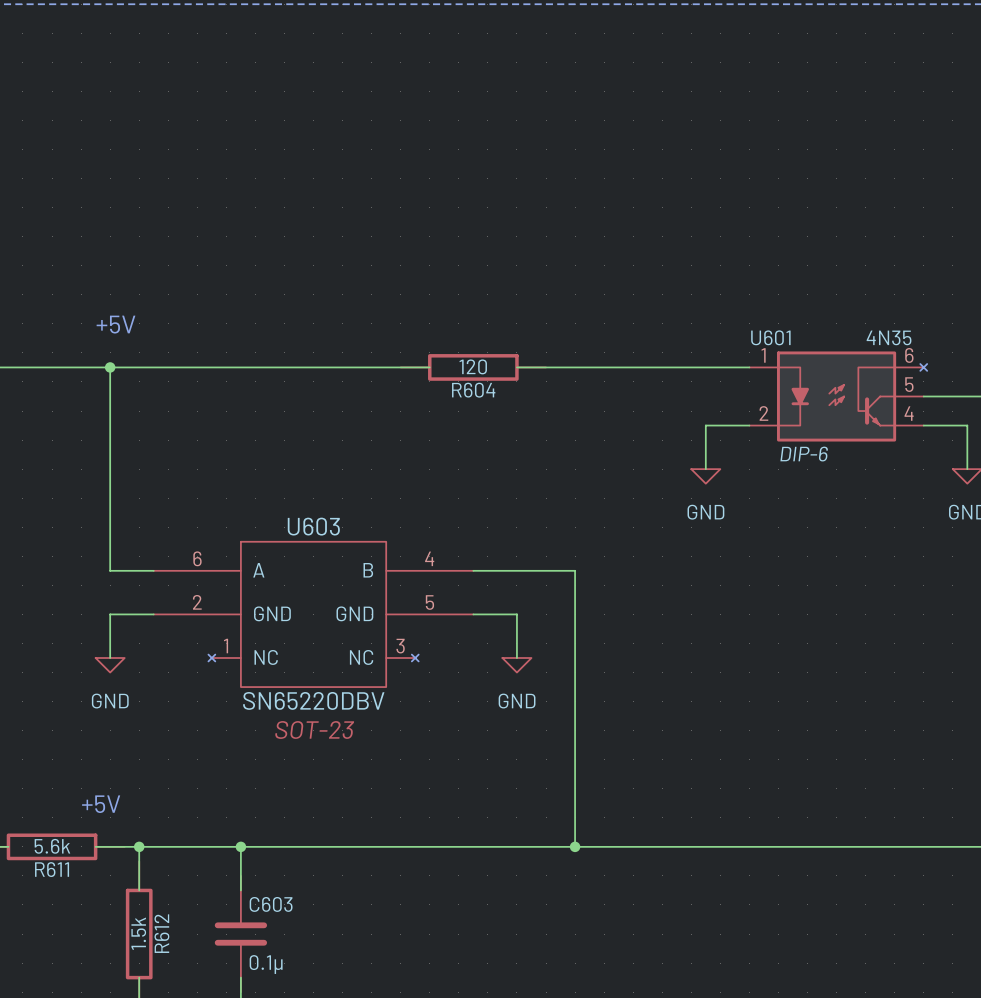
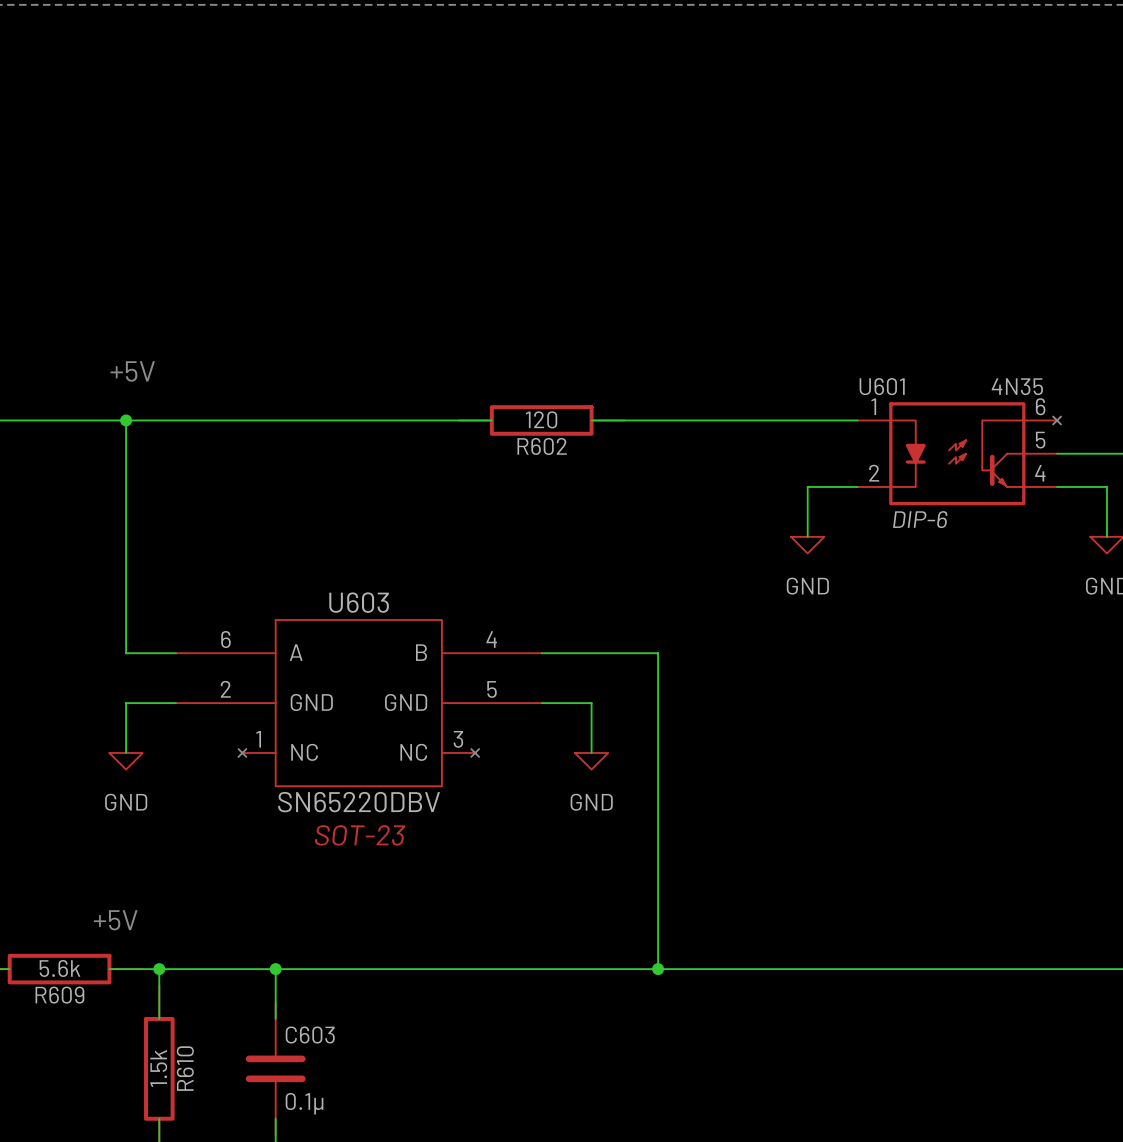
R604 name: R604 (473, 390) -> R602 (542, 446)
R611 name: R611 (52, 869) -> R609 (59, 995)
R612 name: R612 (161, 933) -> R610 (185, 1068)

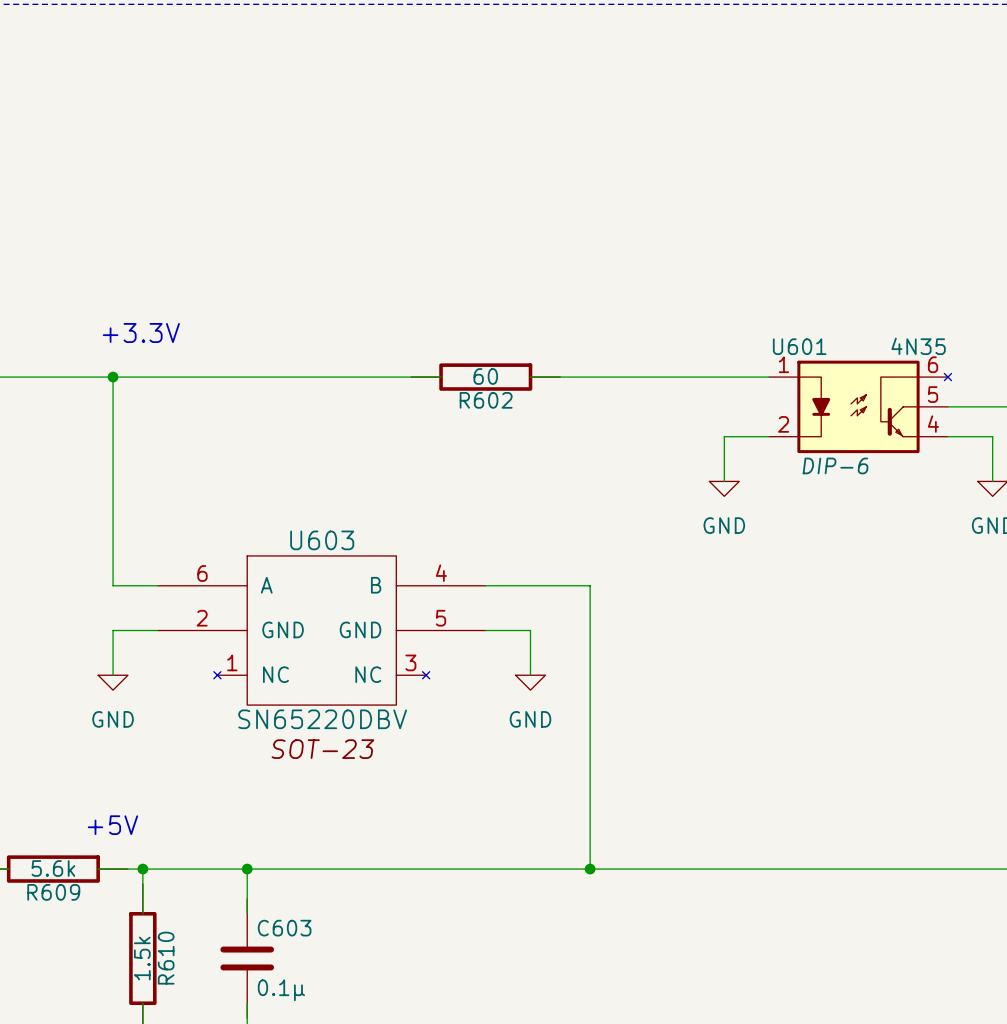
text: +5V (132, 371) -> +3.3V (141, 332)
R602 value: 120 (541, 419) -> 60 (485, 376)

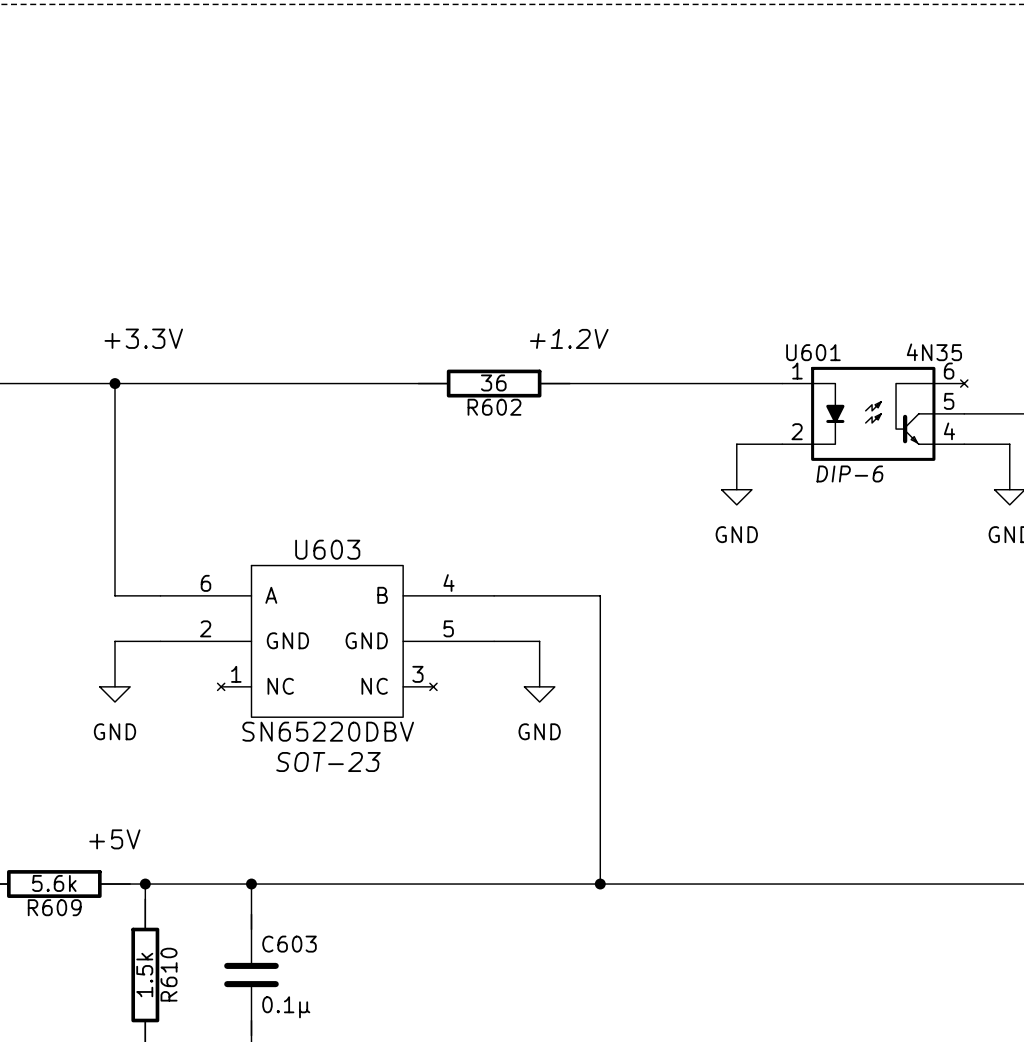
text: none -> +1.2V (569, 338)
R602 value: 60 (485, 376) -> 36 (493, 382)

